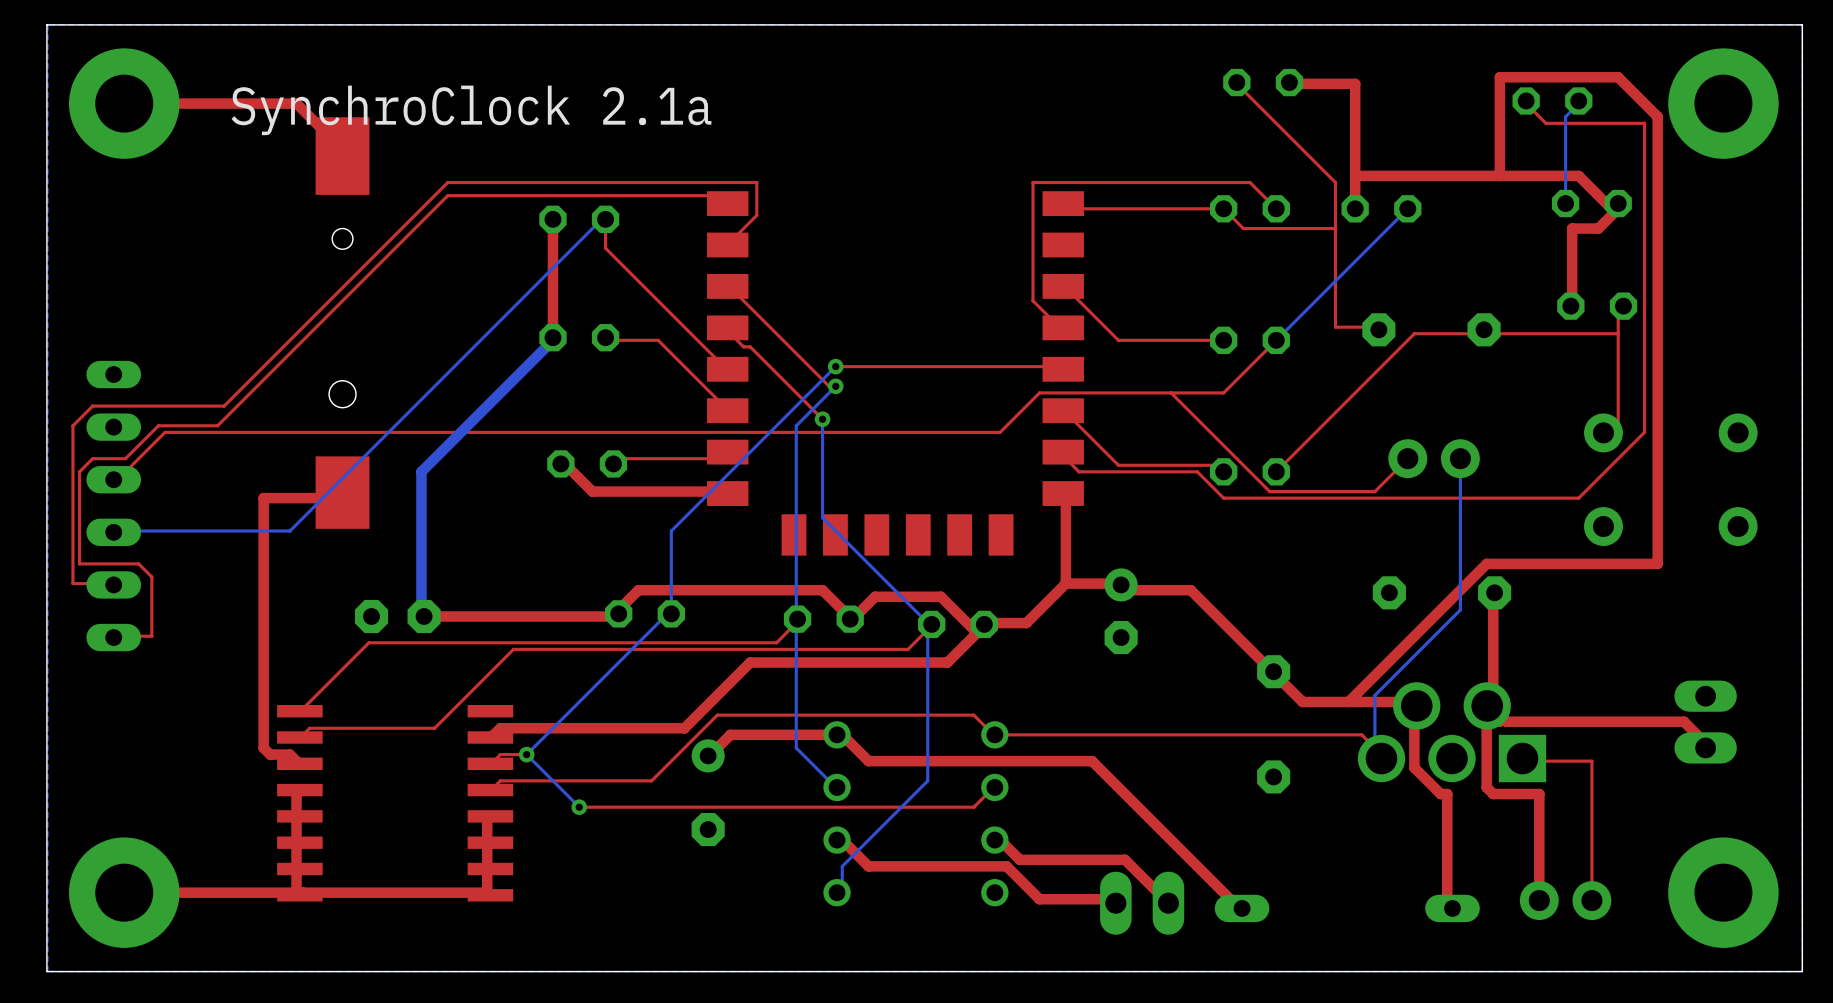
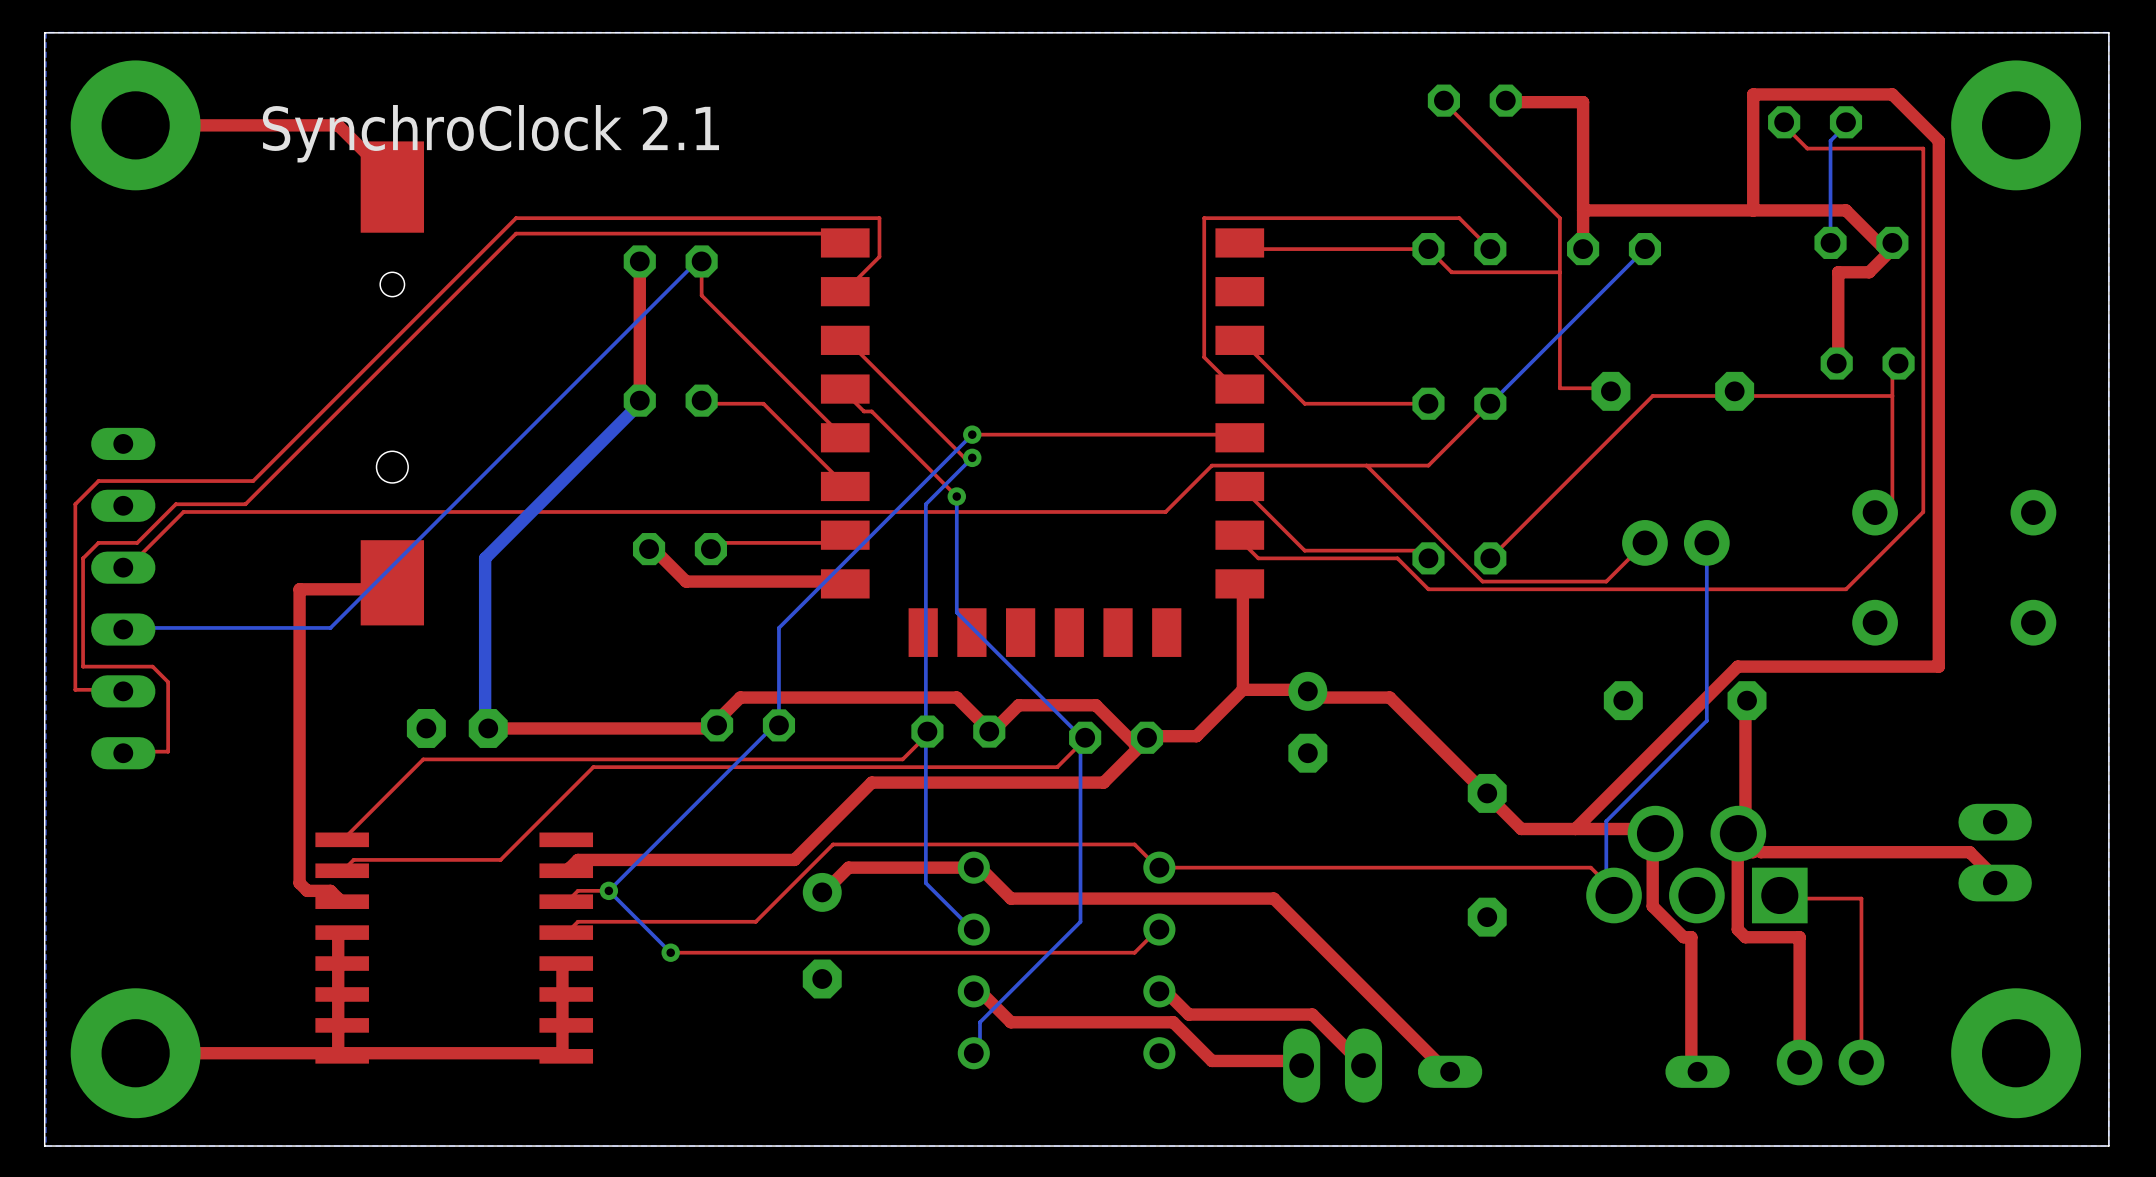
text: SynchroClock 2.1a (471, 110) -> SynchroClock 2.1 (490, 133)

